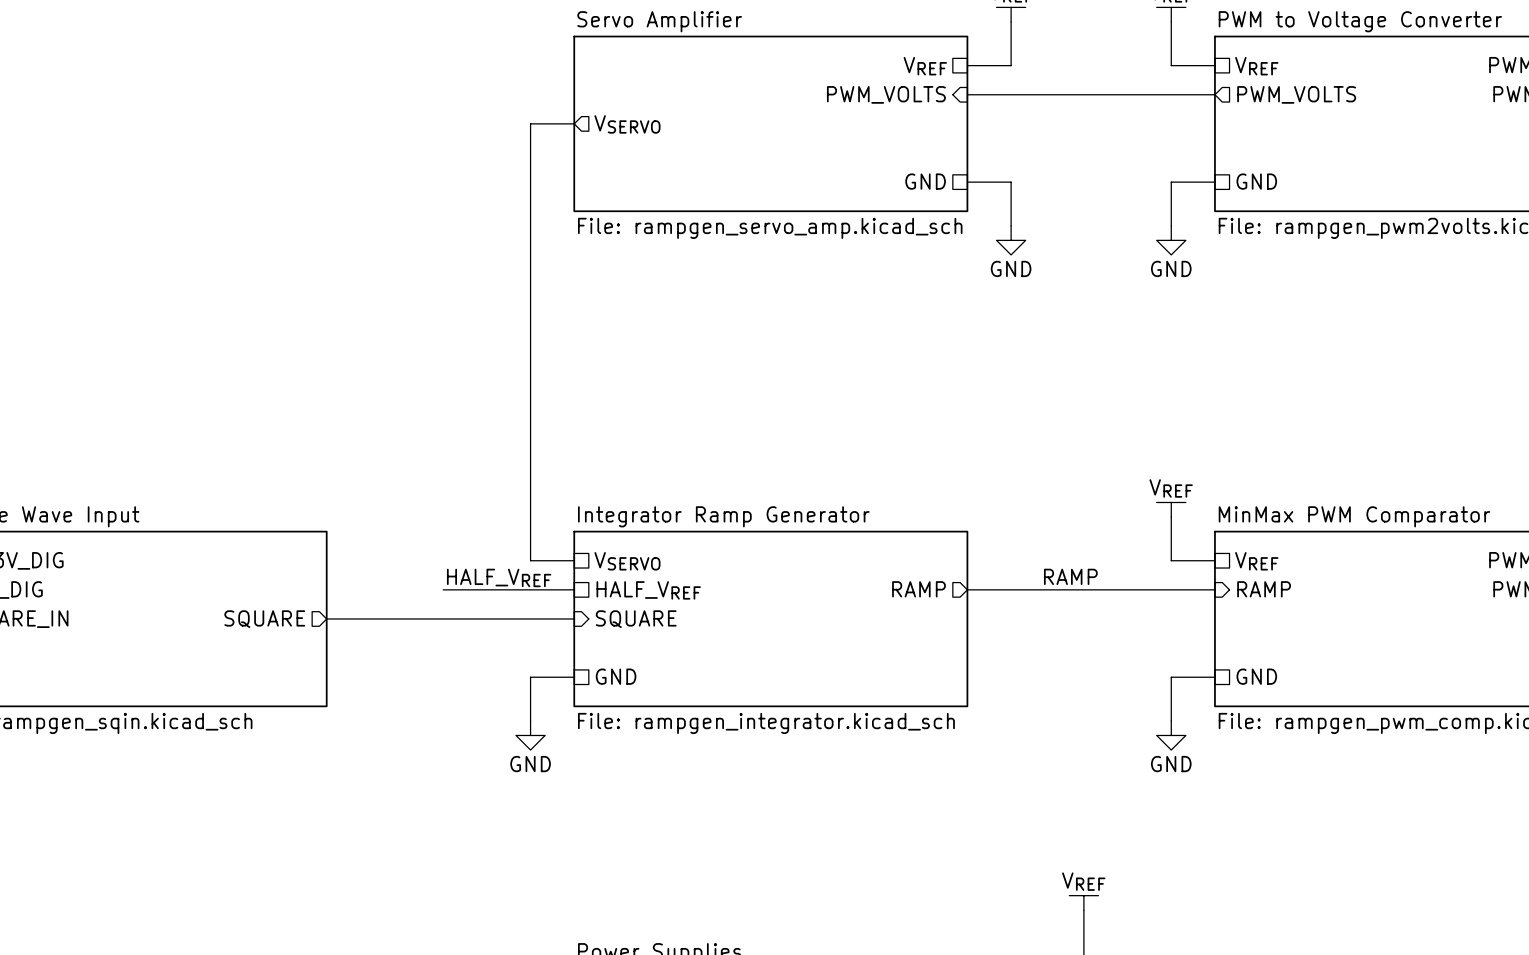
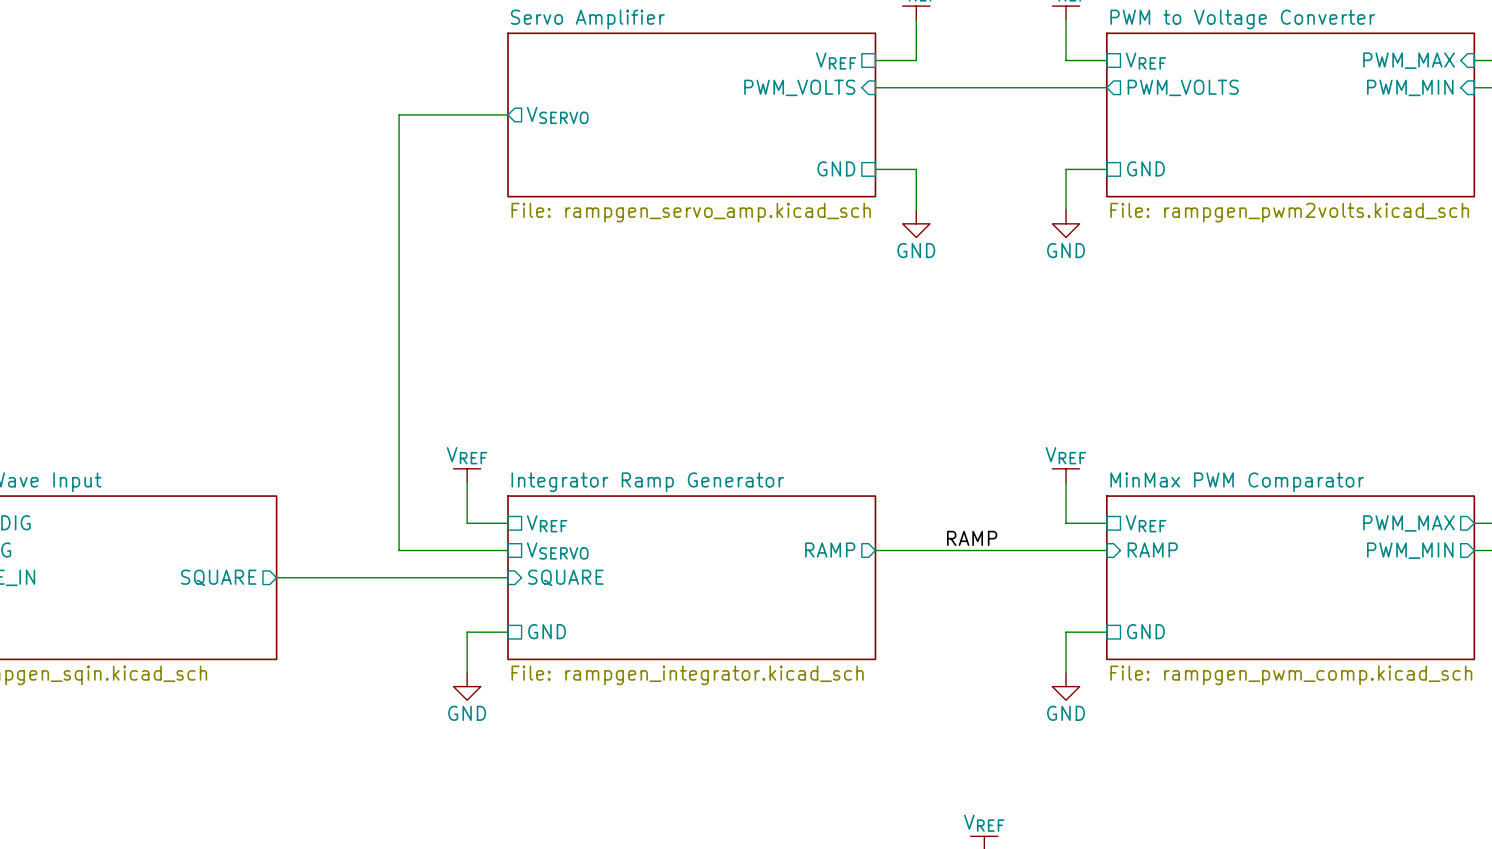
wire: (530, 123) (530, 517) -> (467, 114) (399, 114) (399, 550)
power symbol: none -> VREF (467, 475)
sheet pin: VSERVO (627, 561) -> VREF (547, 523)
label: HALF_VREF (499, 577) -> none
wire: (443, 589) (457, 589) -> none
sheet pin: HALF_VREF (648, 590) -> VSERVO (557, 551)

